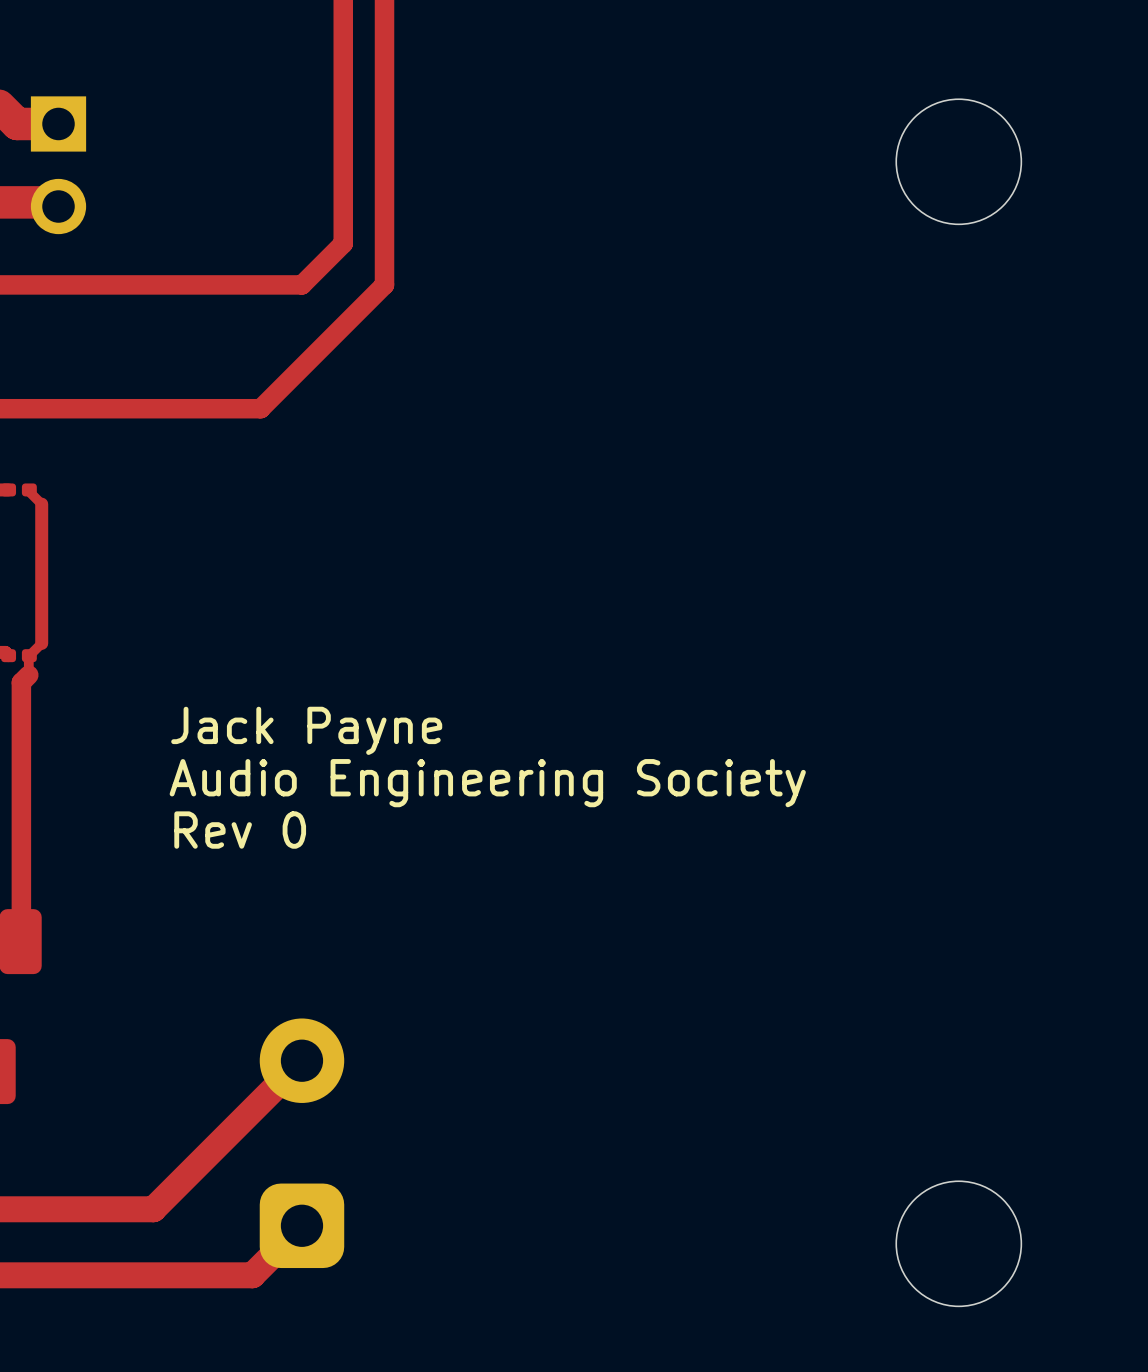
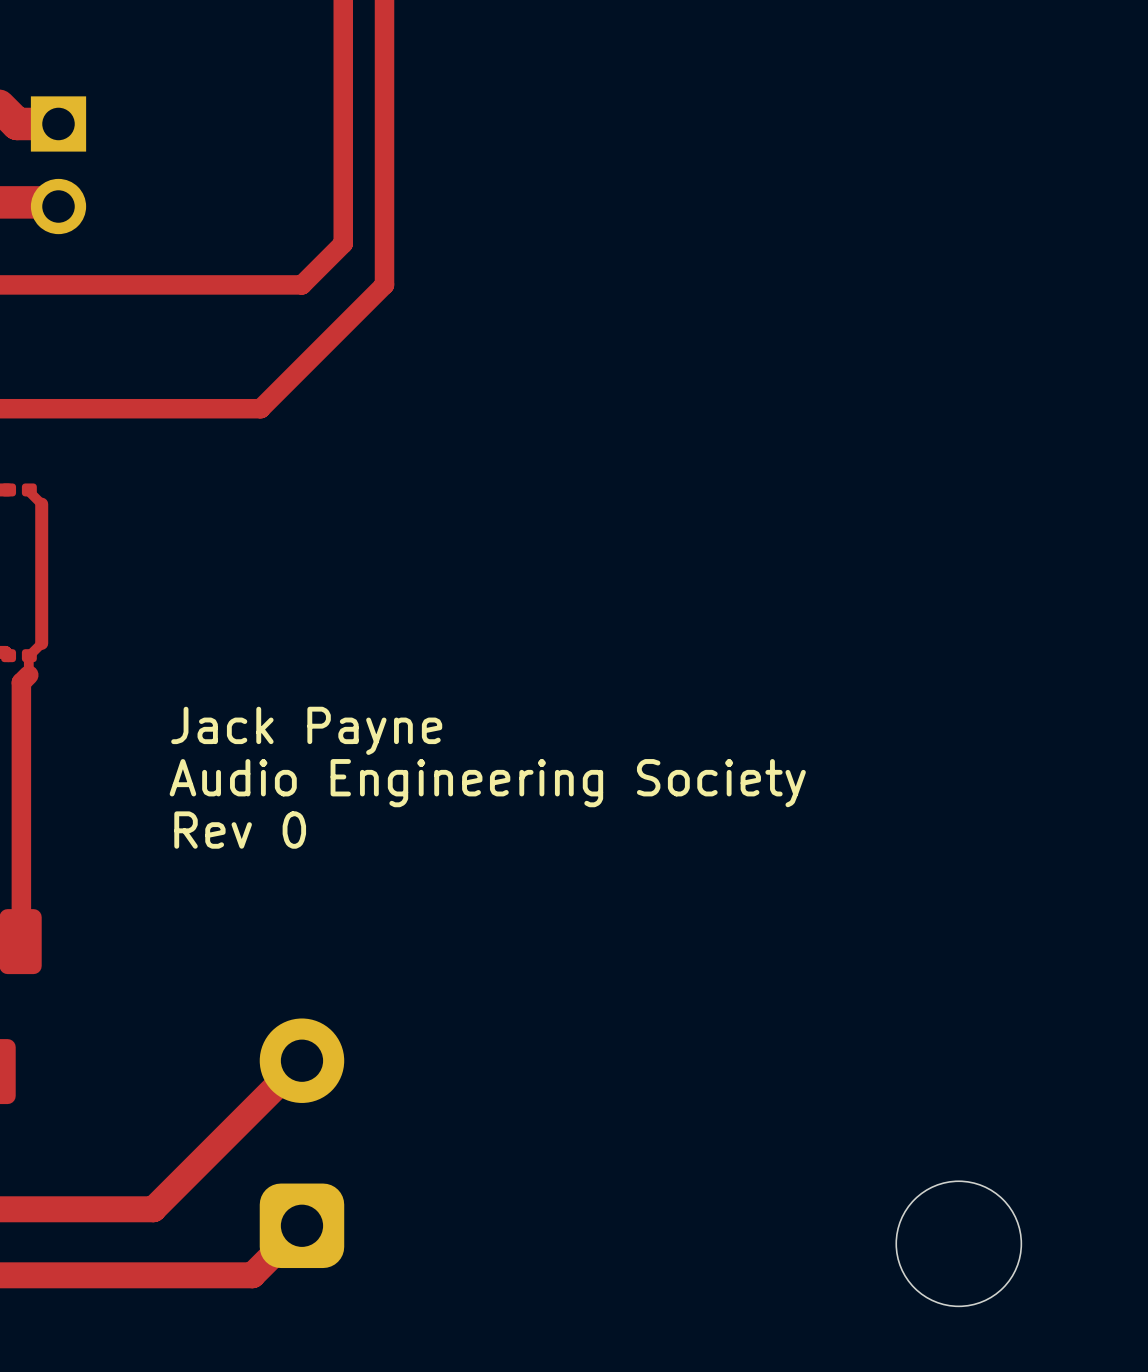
round board edge: [895, 98, 1023, 226] -> none

